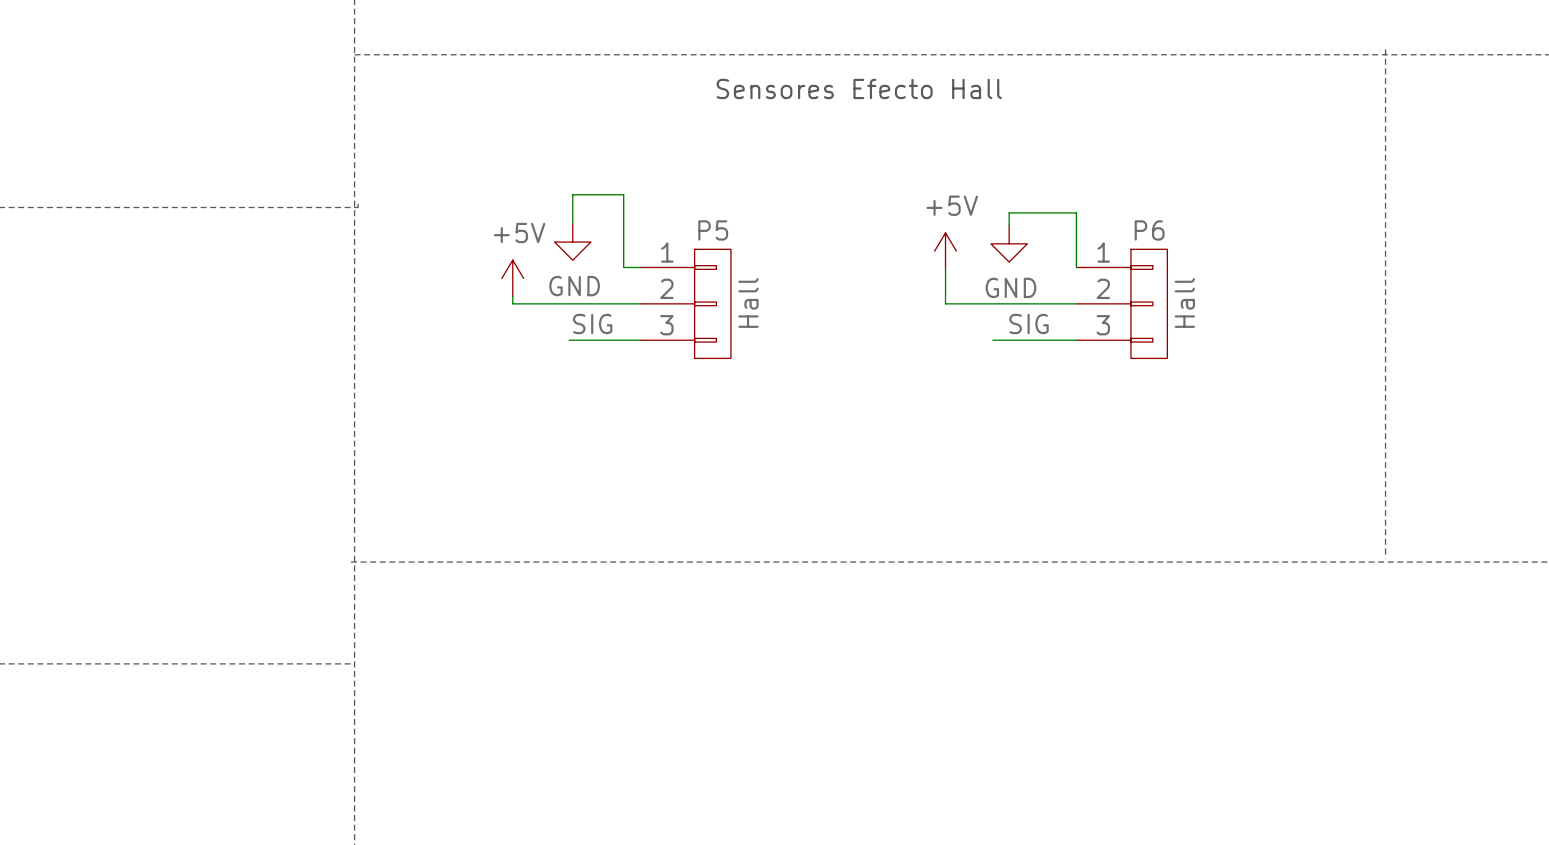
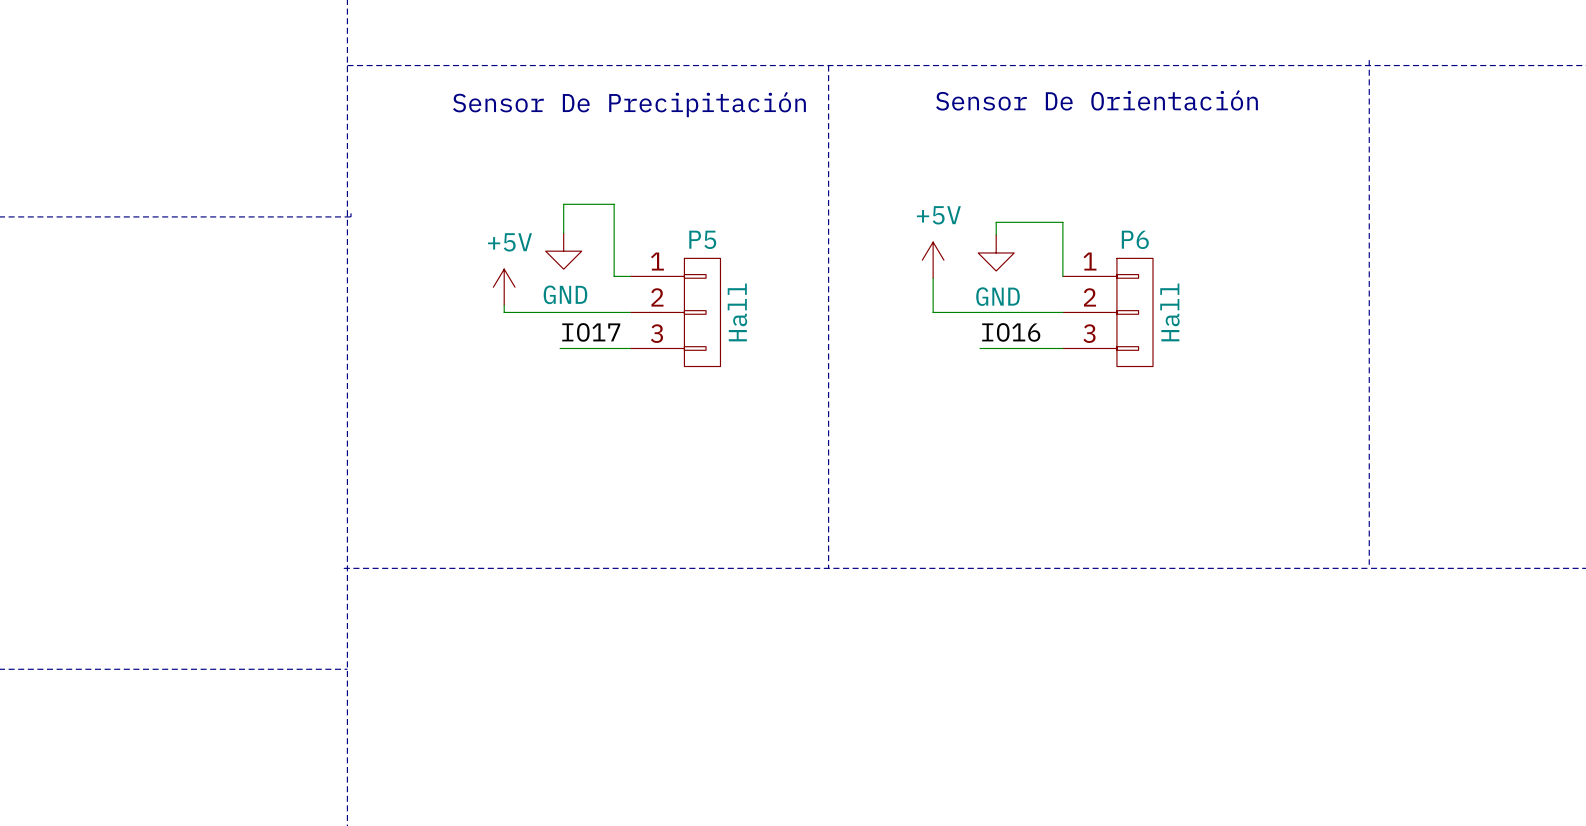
line: none -> (828, 65) (828, 568)
text: Sensores Efecto Hall (859, 88) -> none
text: none -> Sensor De Orientación (1096, 100)
text: none -> Sensor De Precipitación (629, 104)
label: SIG (592, 324) -> IO17 (591, 332)
label: SIG (1029, 324) -> IO16 (1011, 332)

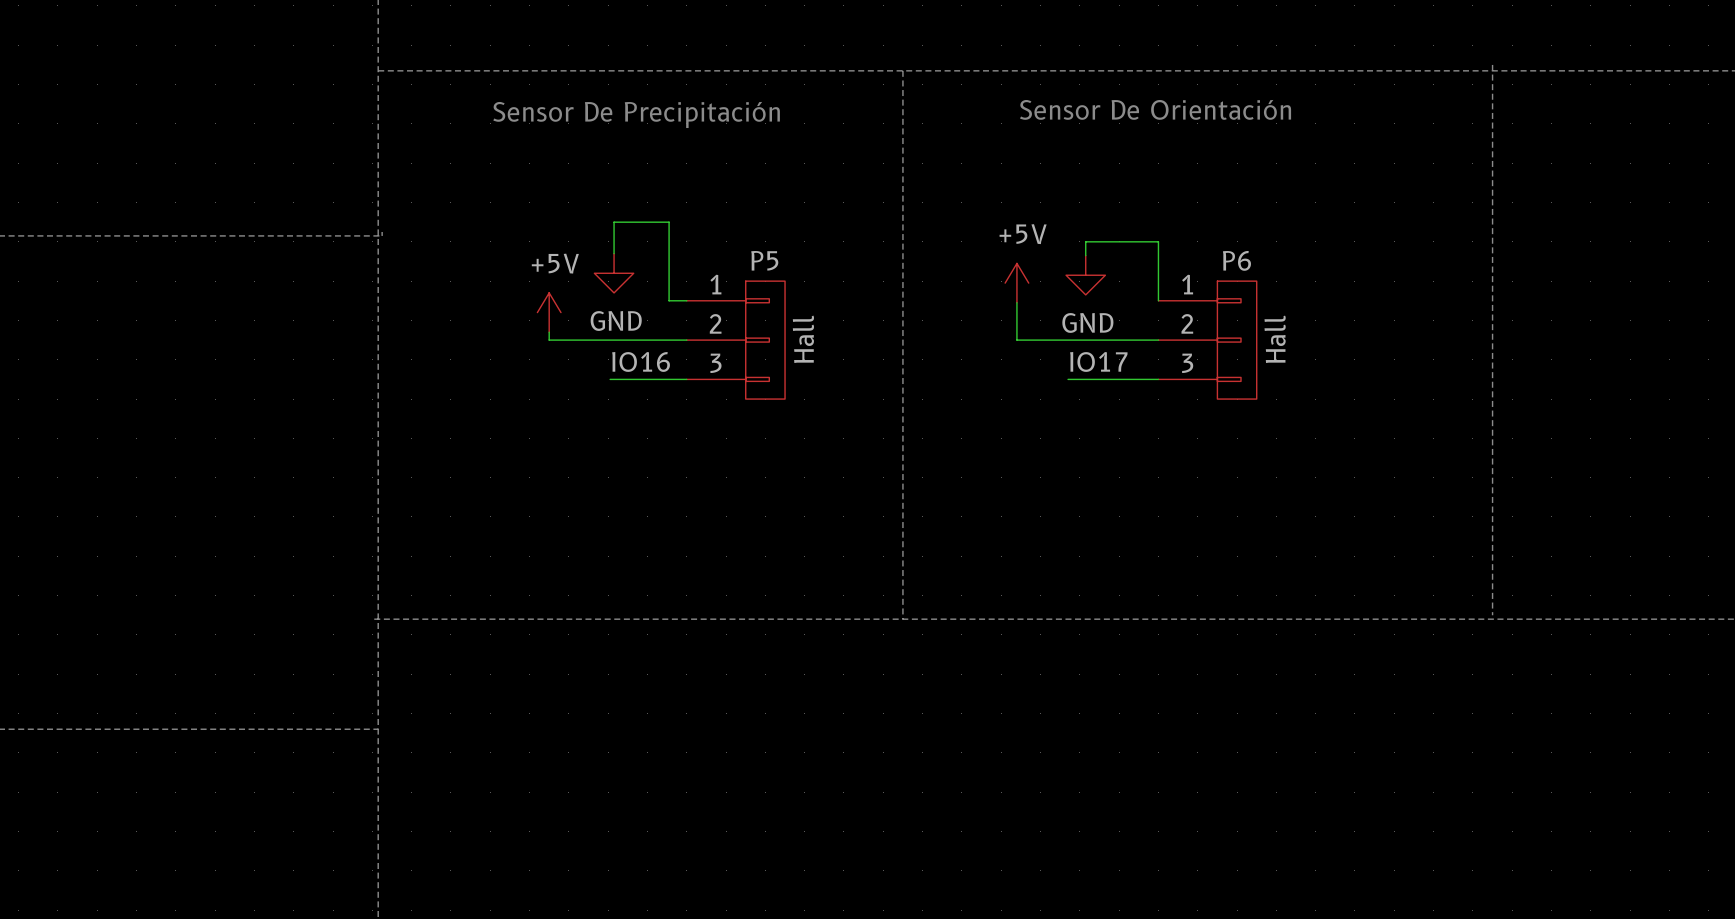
label: IO17 (591, 332) -> IO16 (641, 361)
label: IO16 (1011, 332) -> IO17 (1098, 361)

